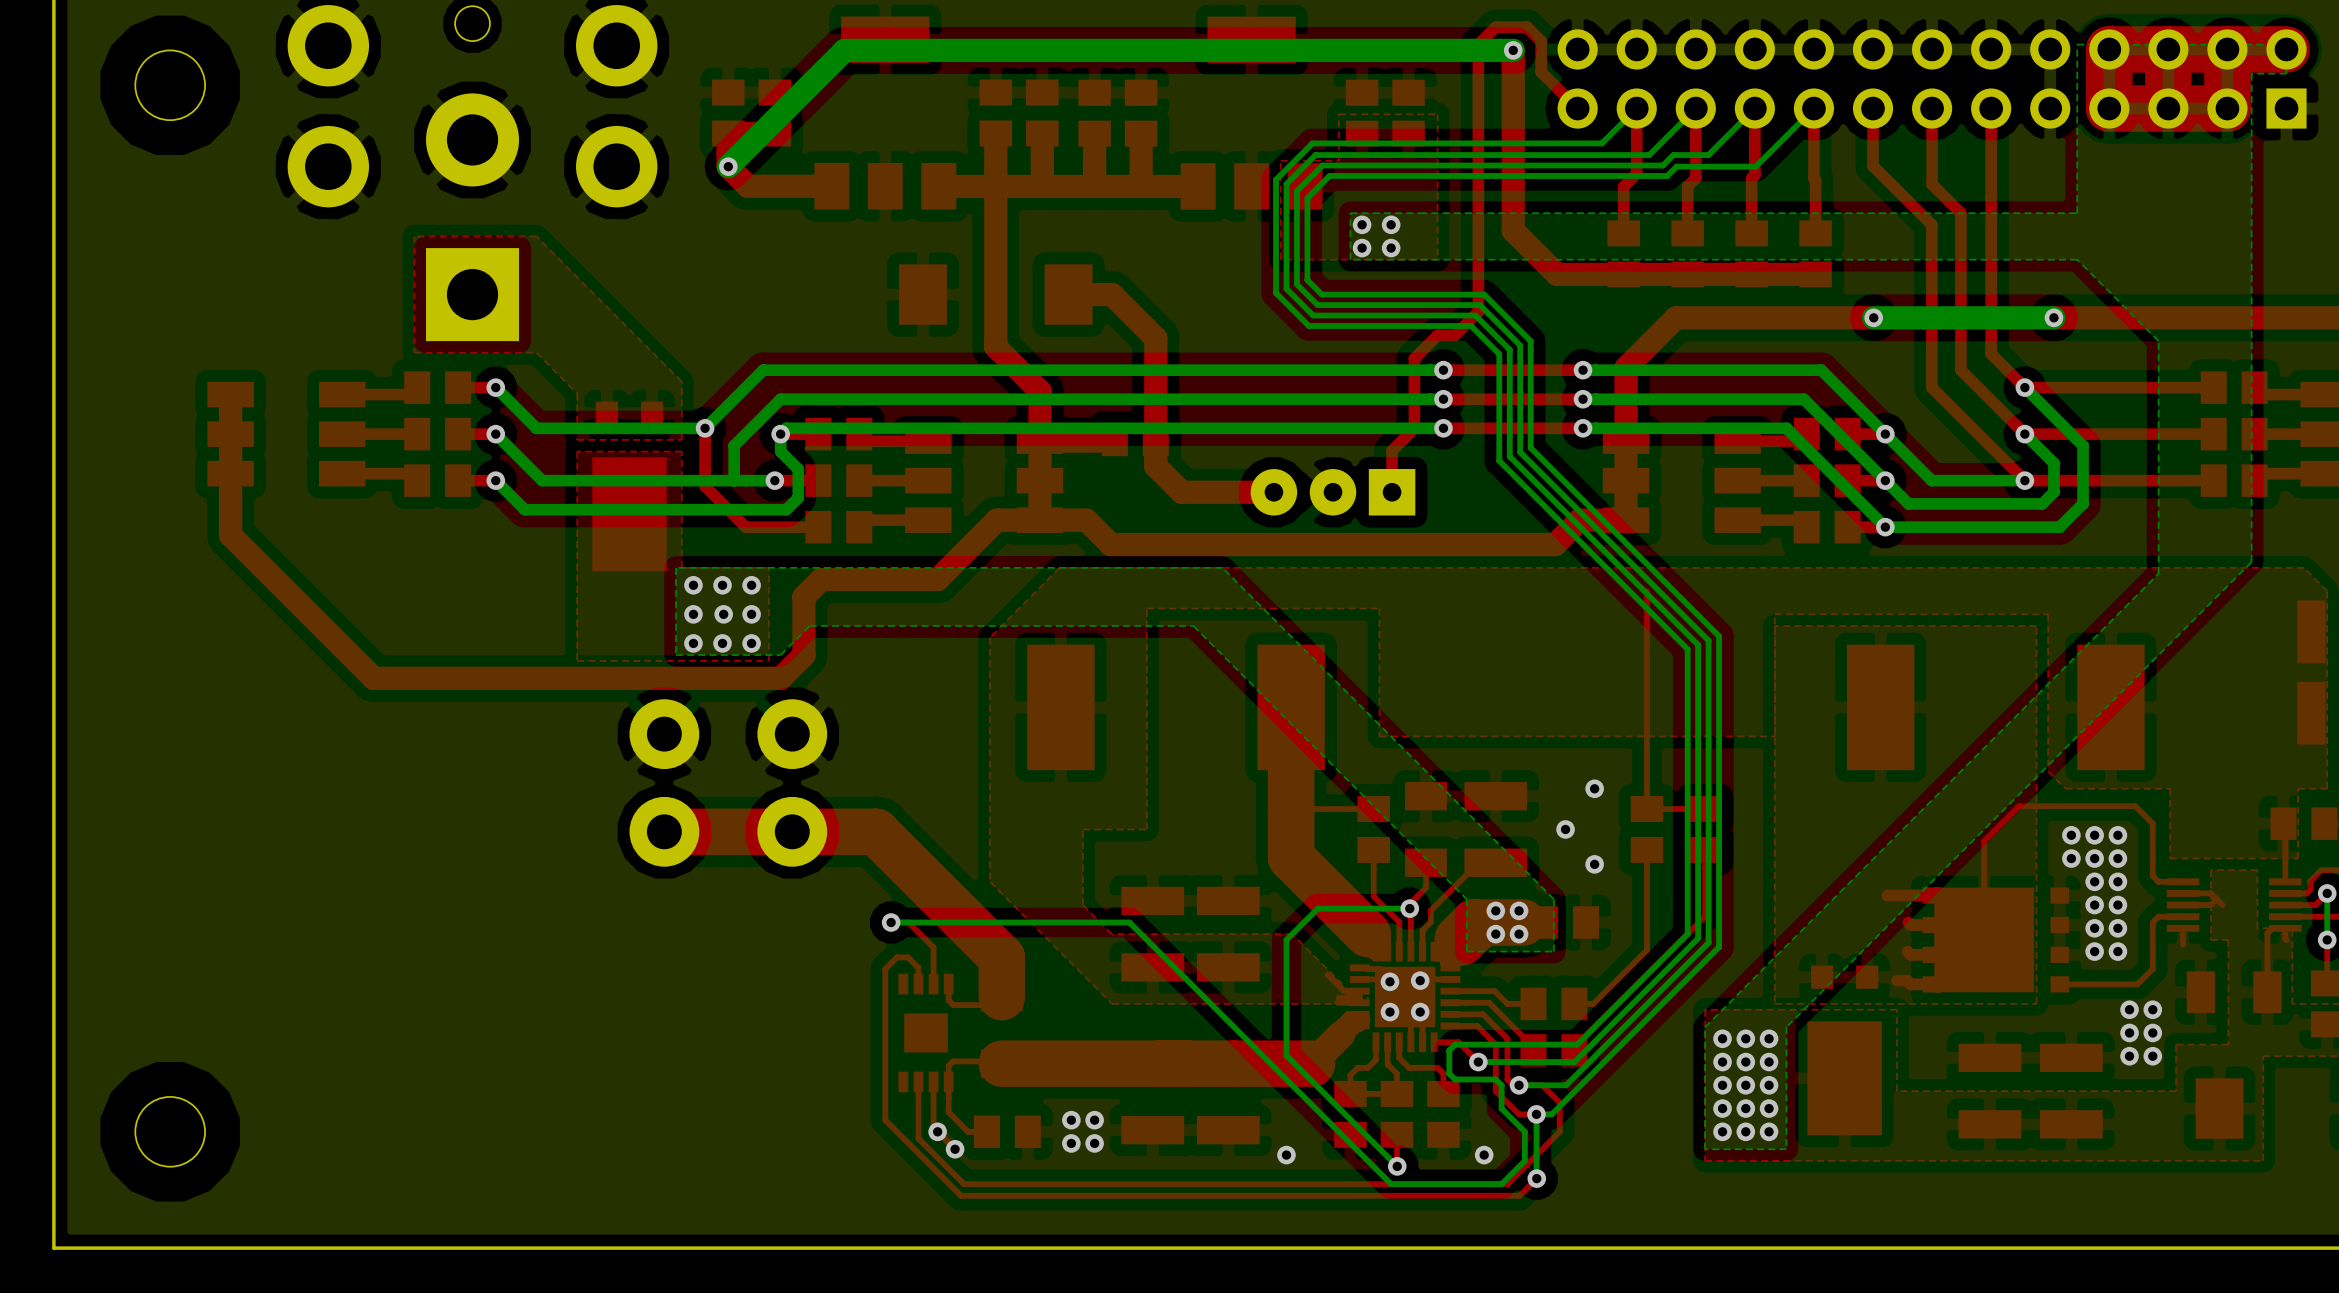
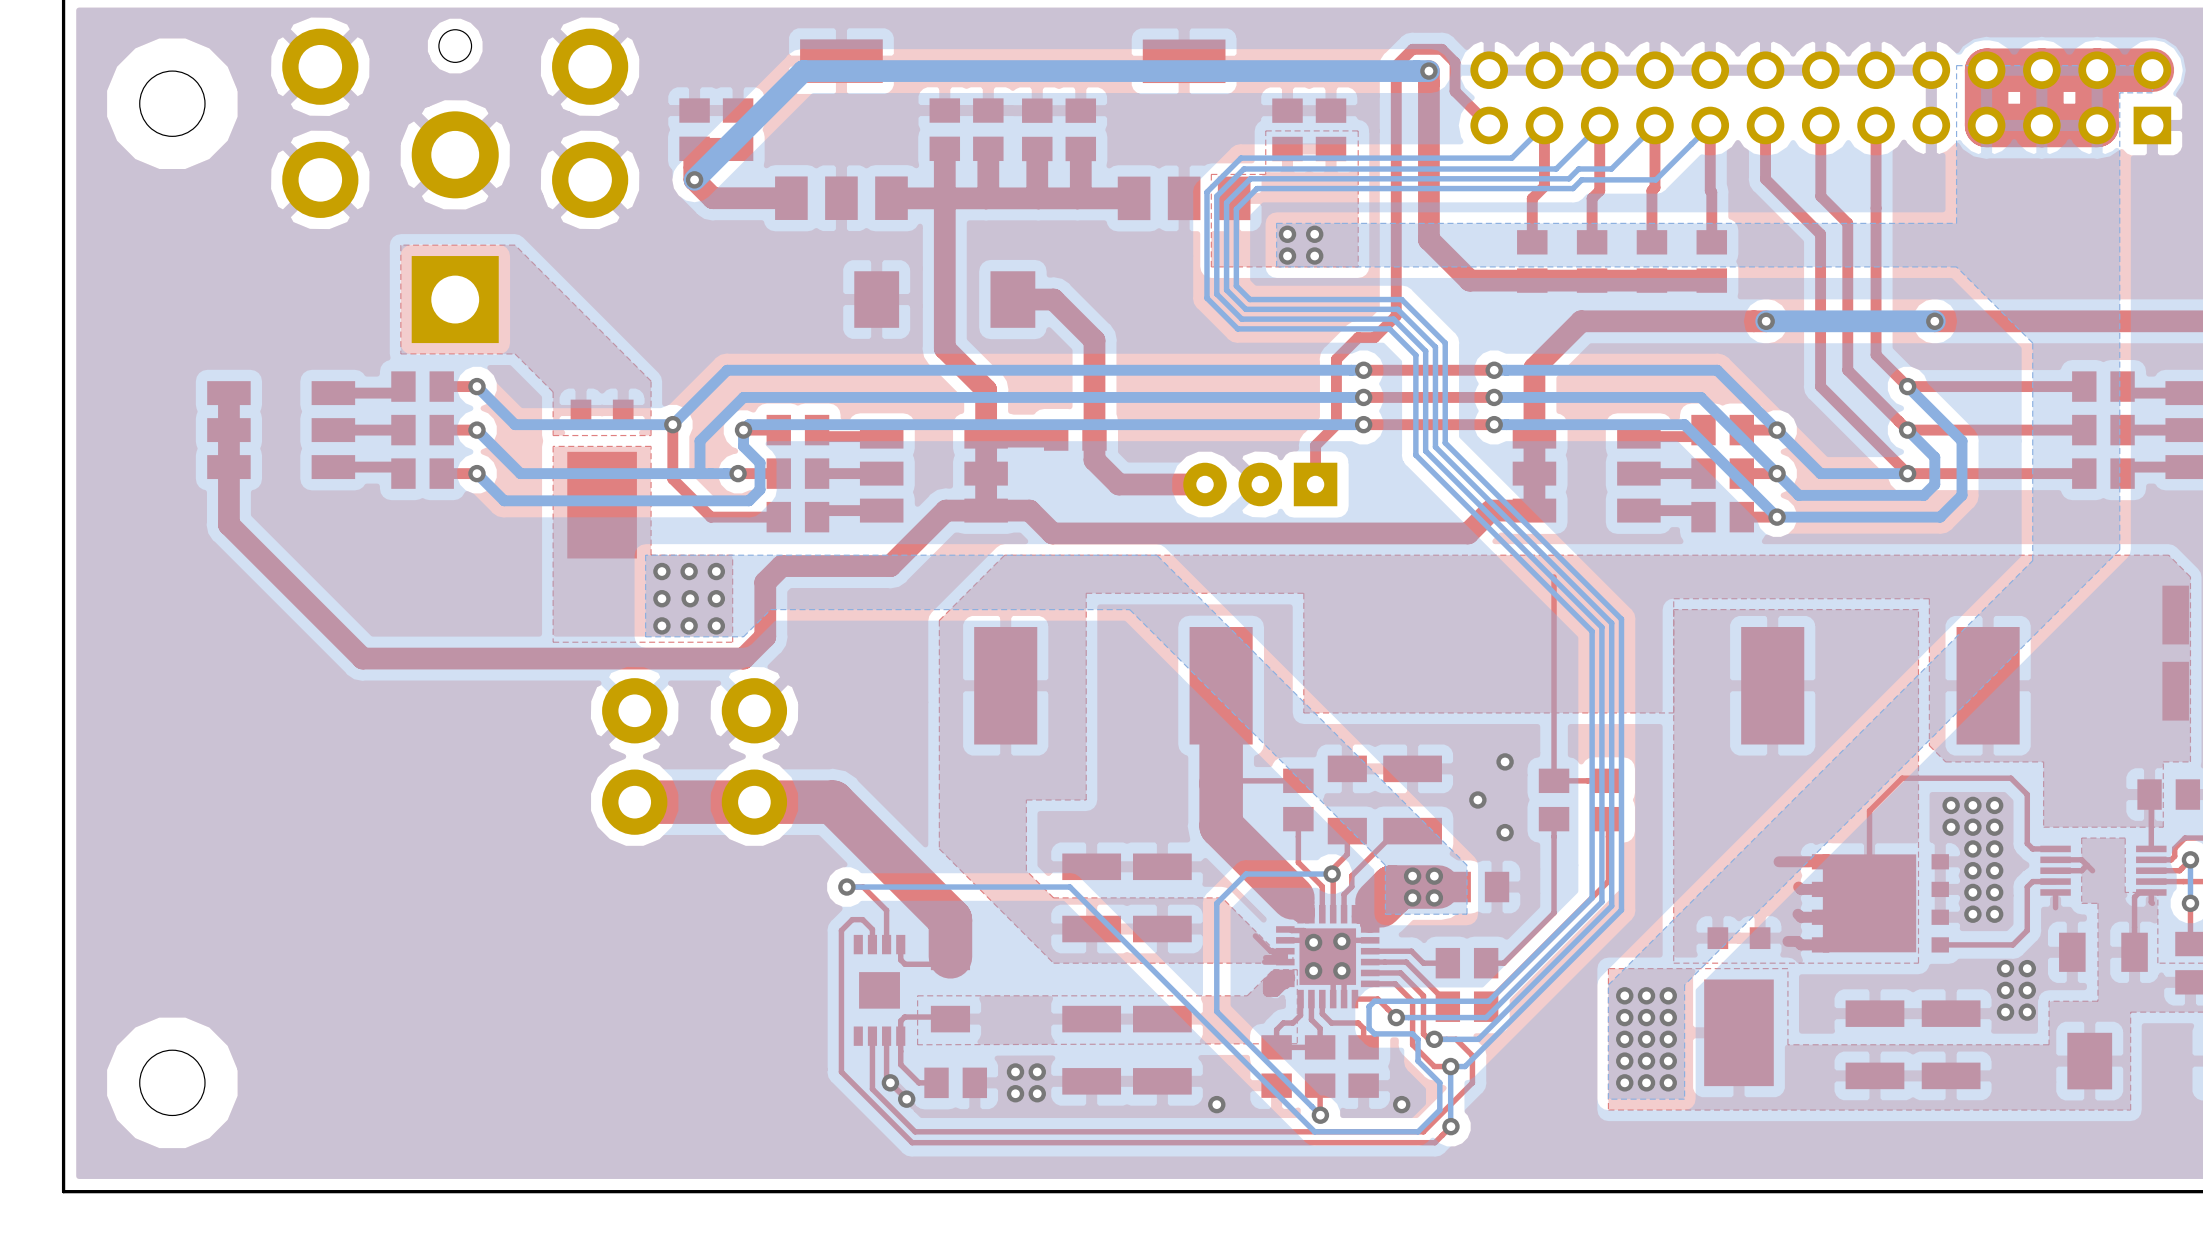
top zone outline: none -> (1297, 969) (1273, 969) (1247, 995) (917, 995) (917, 1044) (1297, 1043) (1297, 969)
top track: (1341, 1034) (1312, 1063) (1001, 1063) -> none

